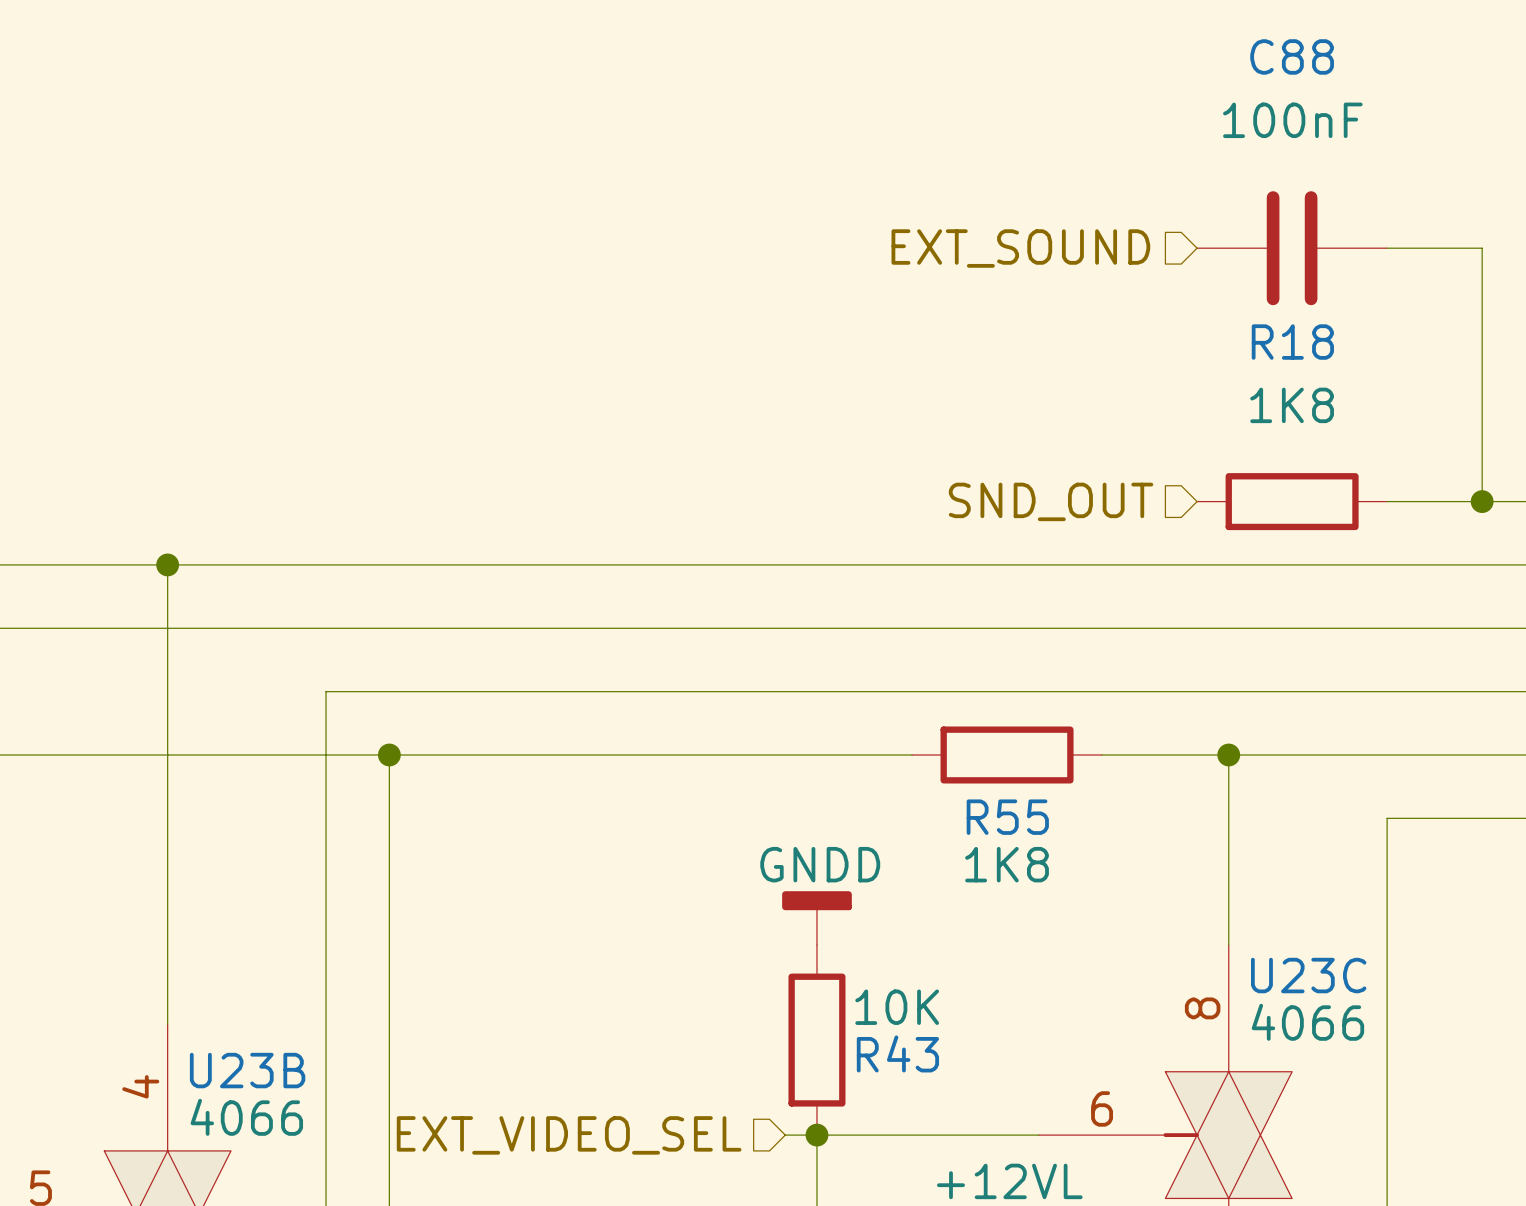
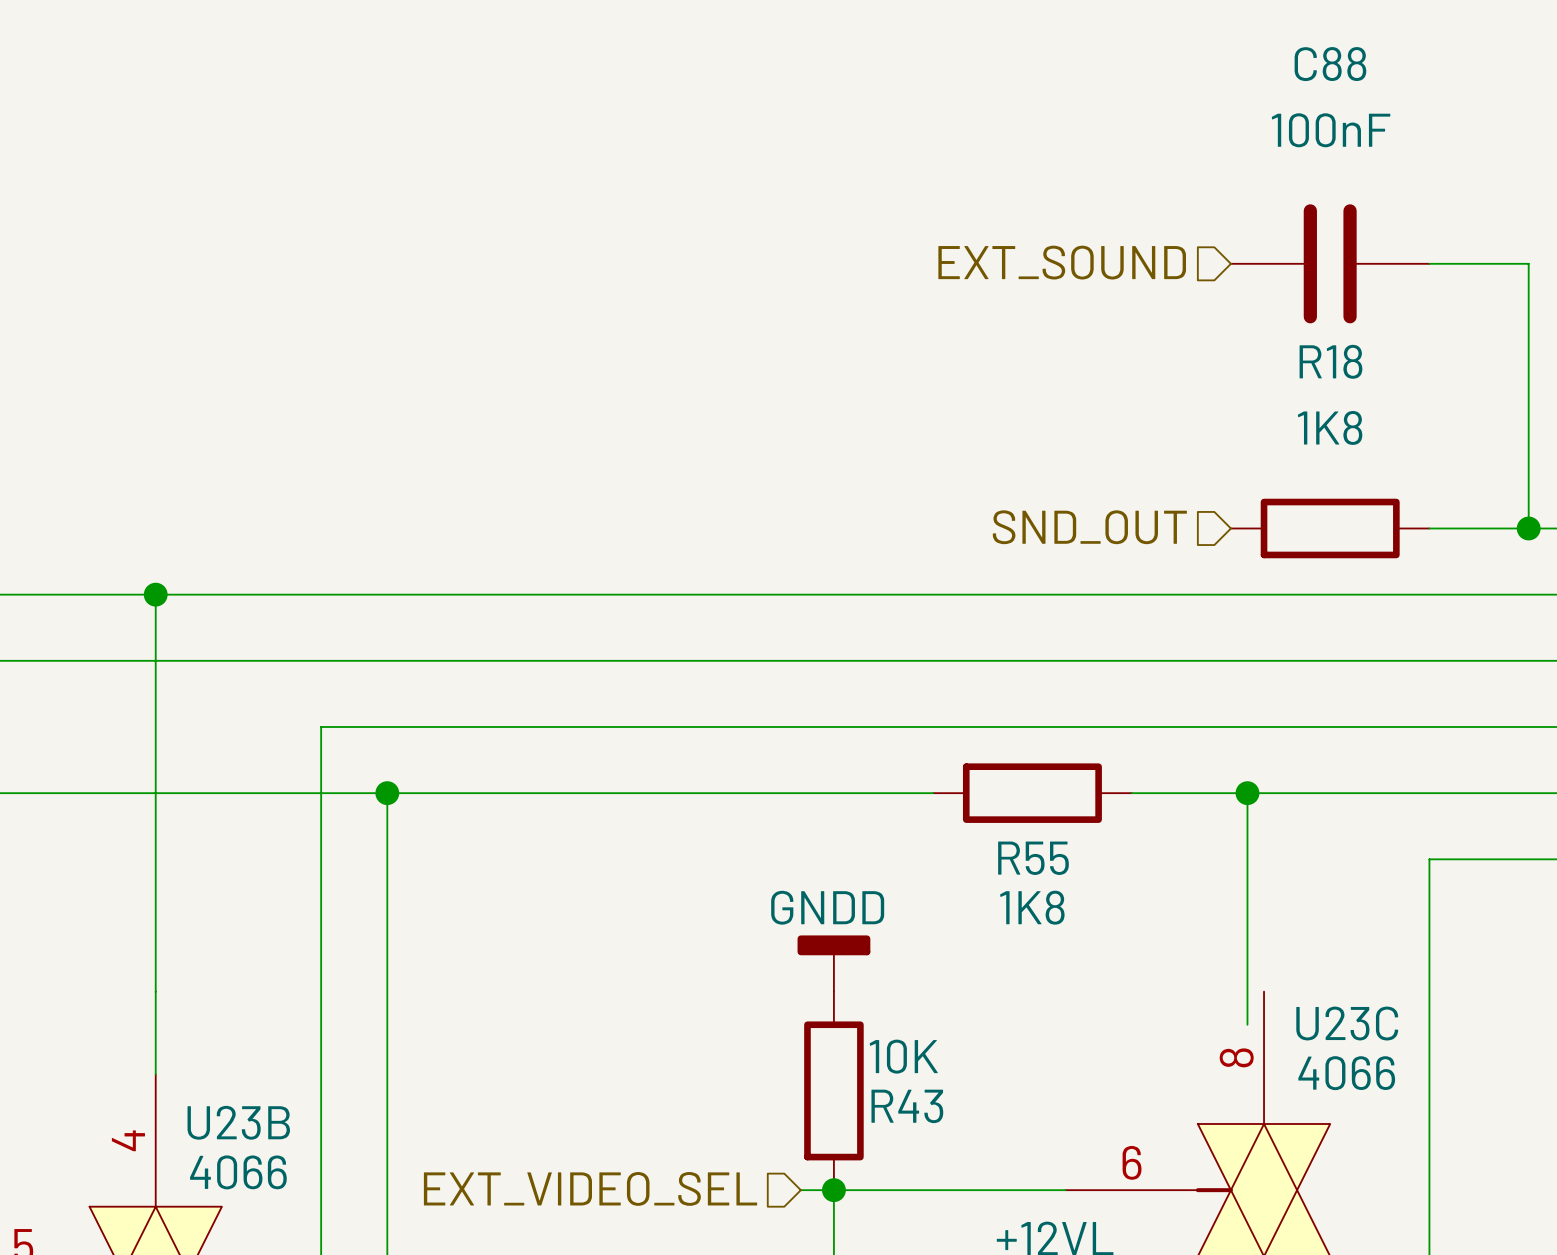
wire: none -> (1247, 793) (1247, 1024)
wire: (1228, 754) (1228, 945) -> none
junction position: (1228, 754) -> (1247, 793)

